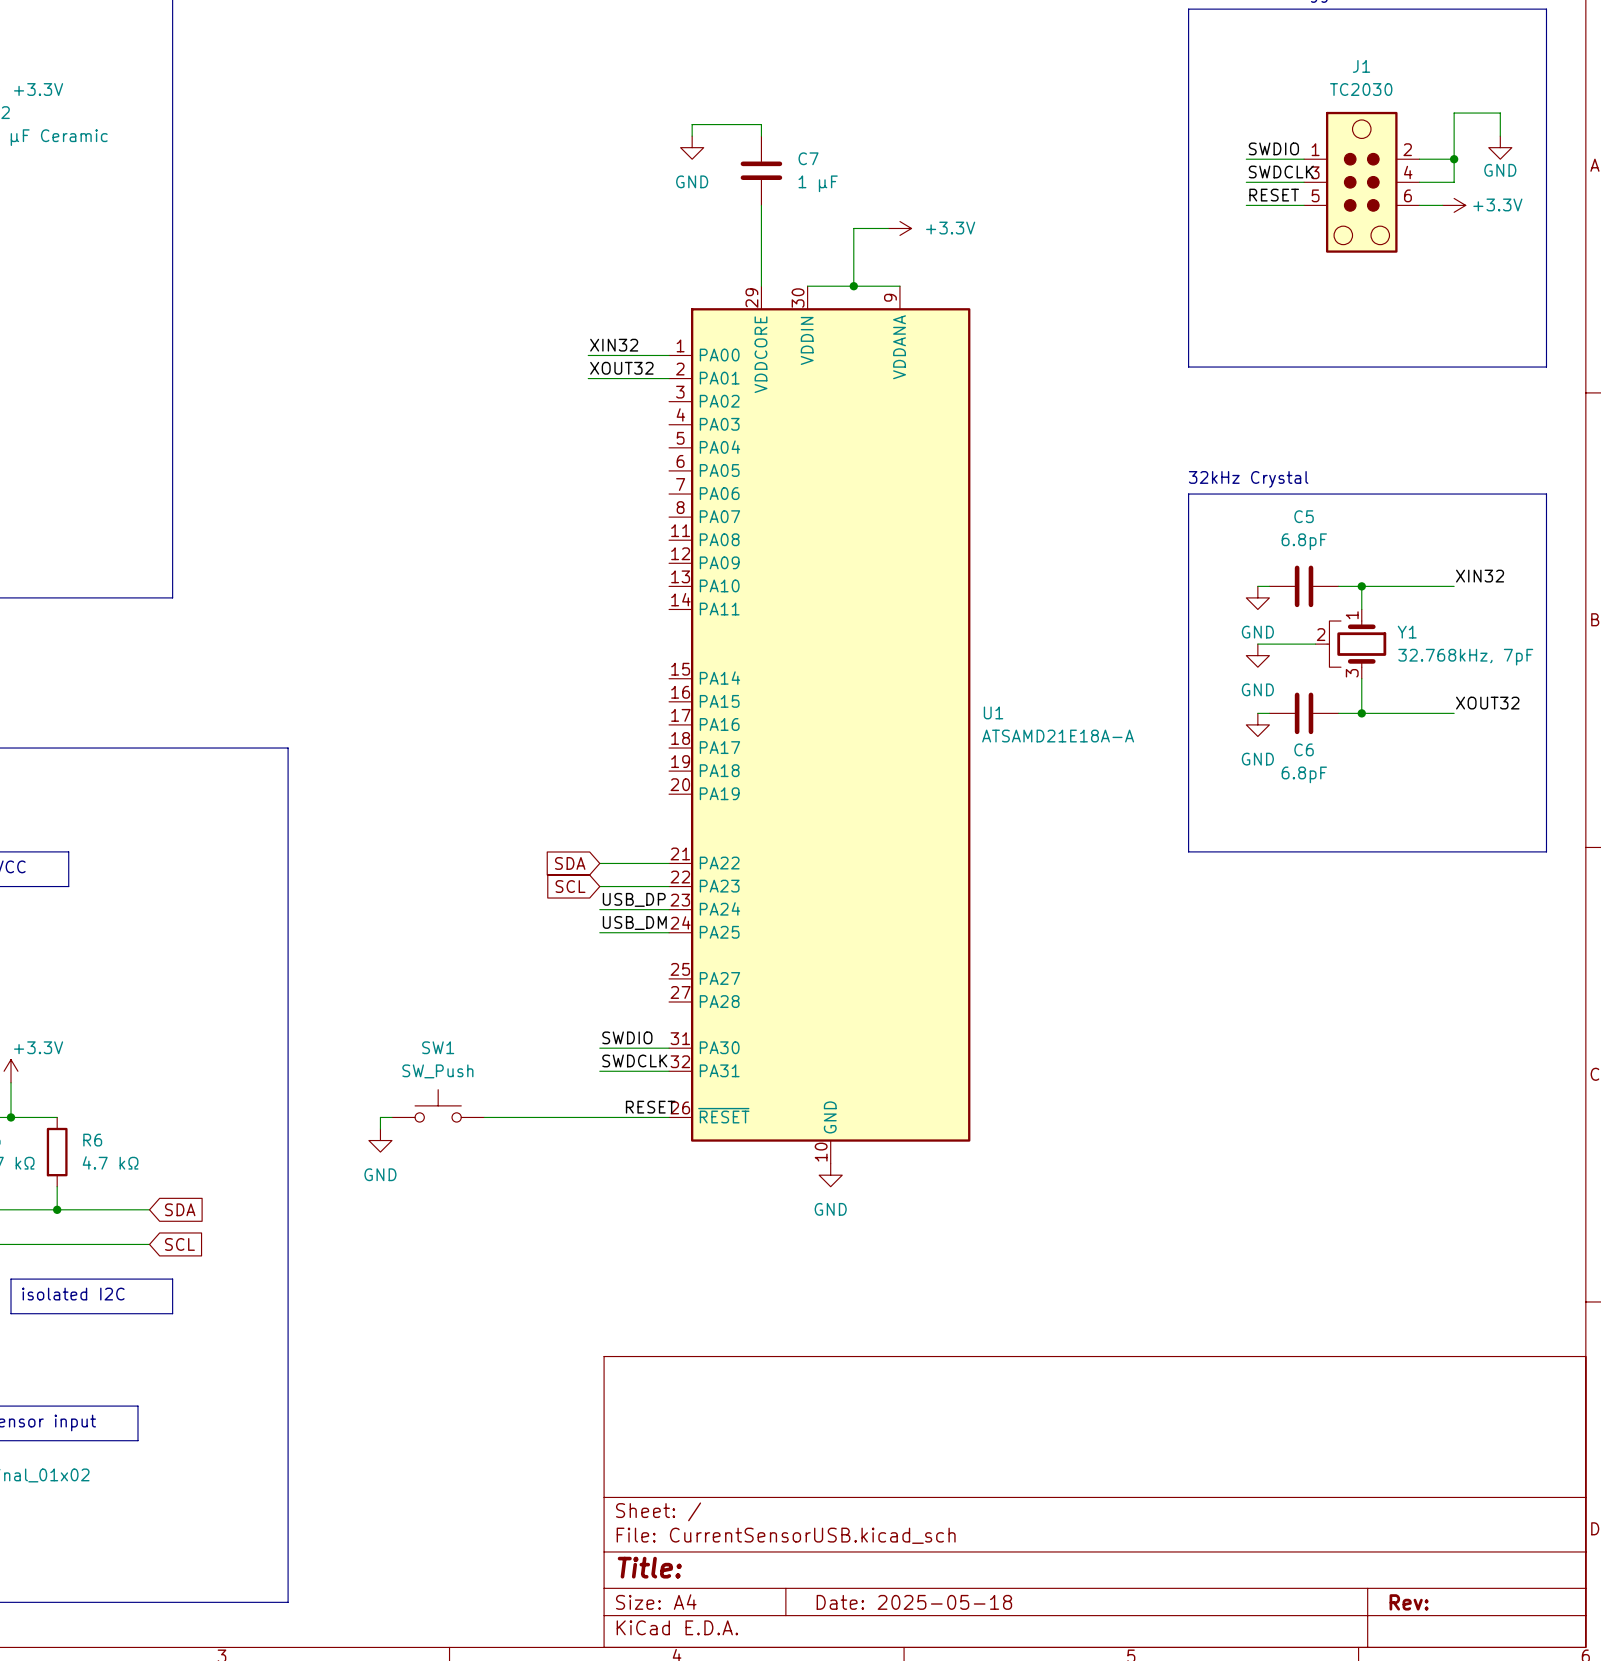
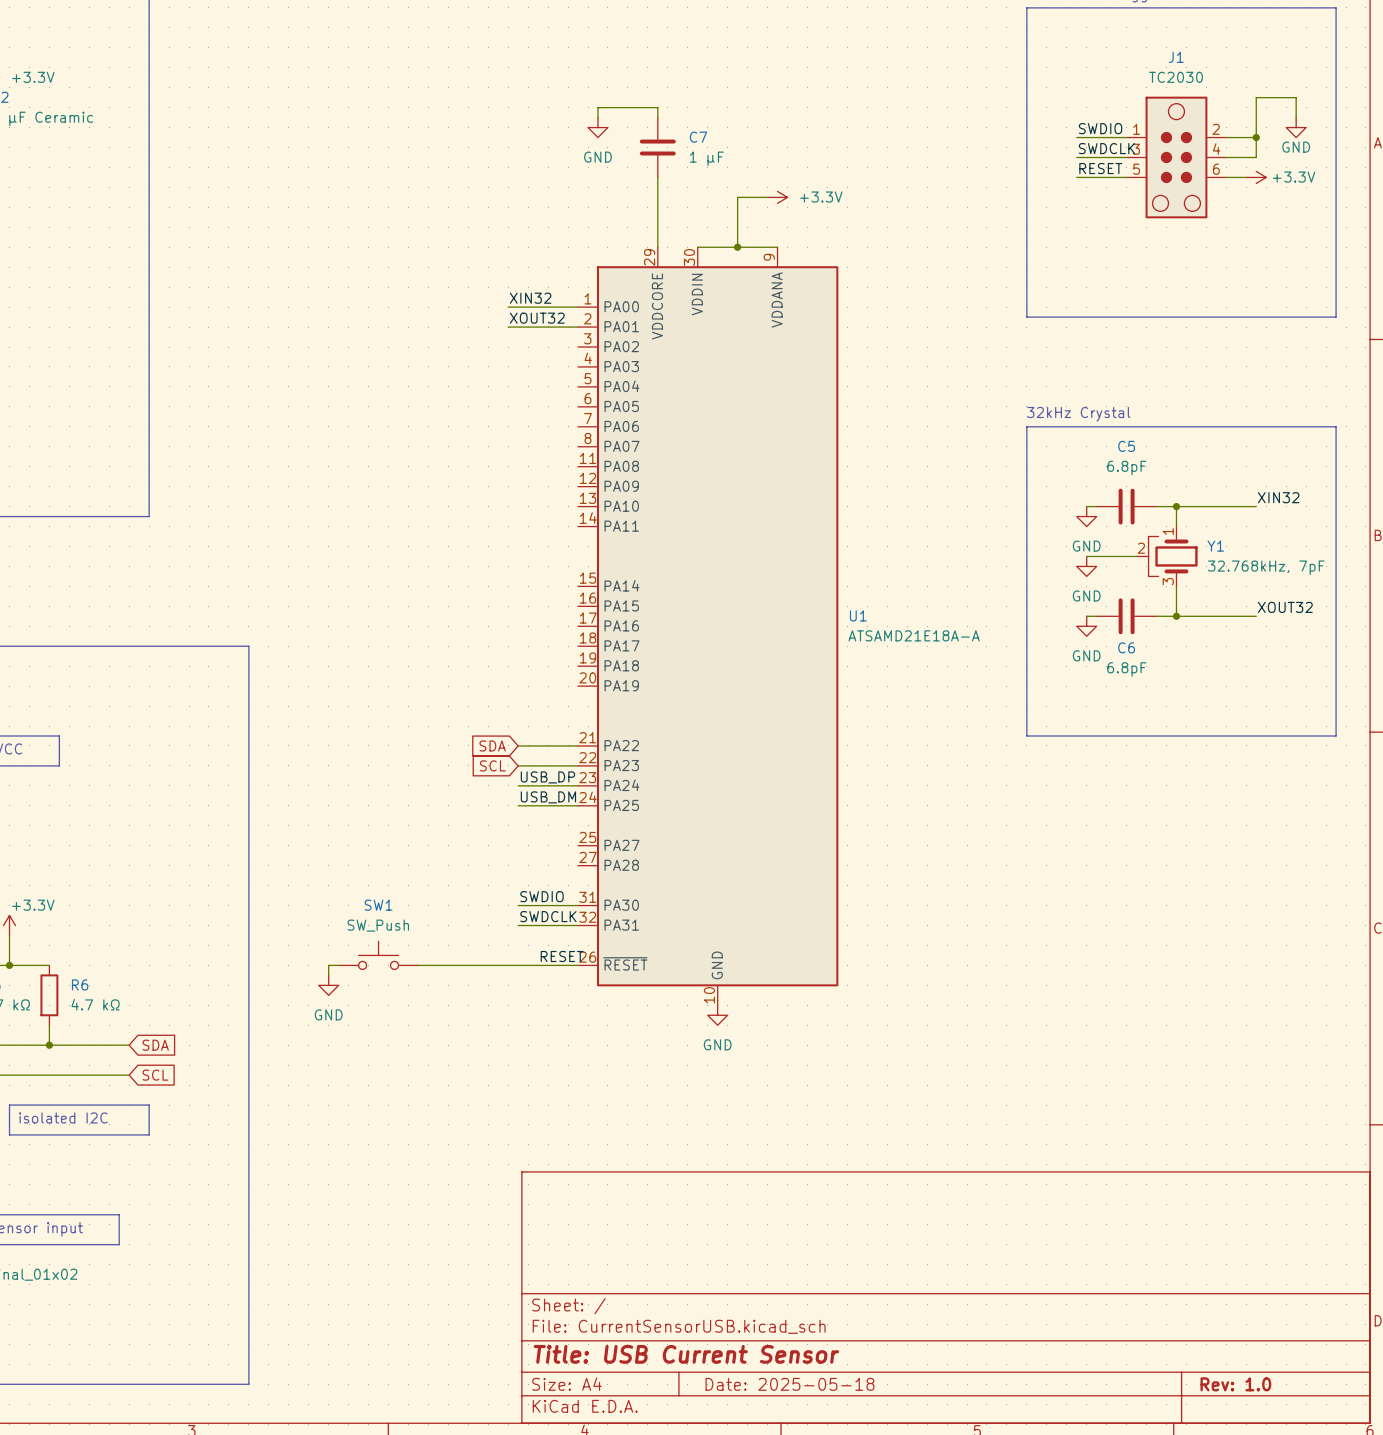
title block: Title: (649, 1567) -> Title: USB Current Sensor (686, 1354)
title block: Rev: (1409, 1602) -> Rev: 1.0 (1235, 1384)

